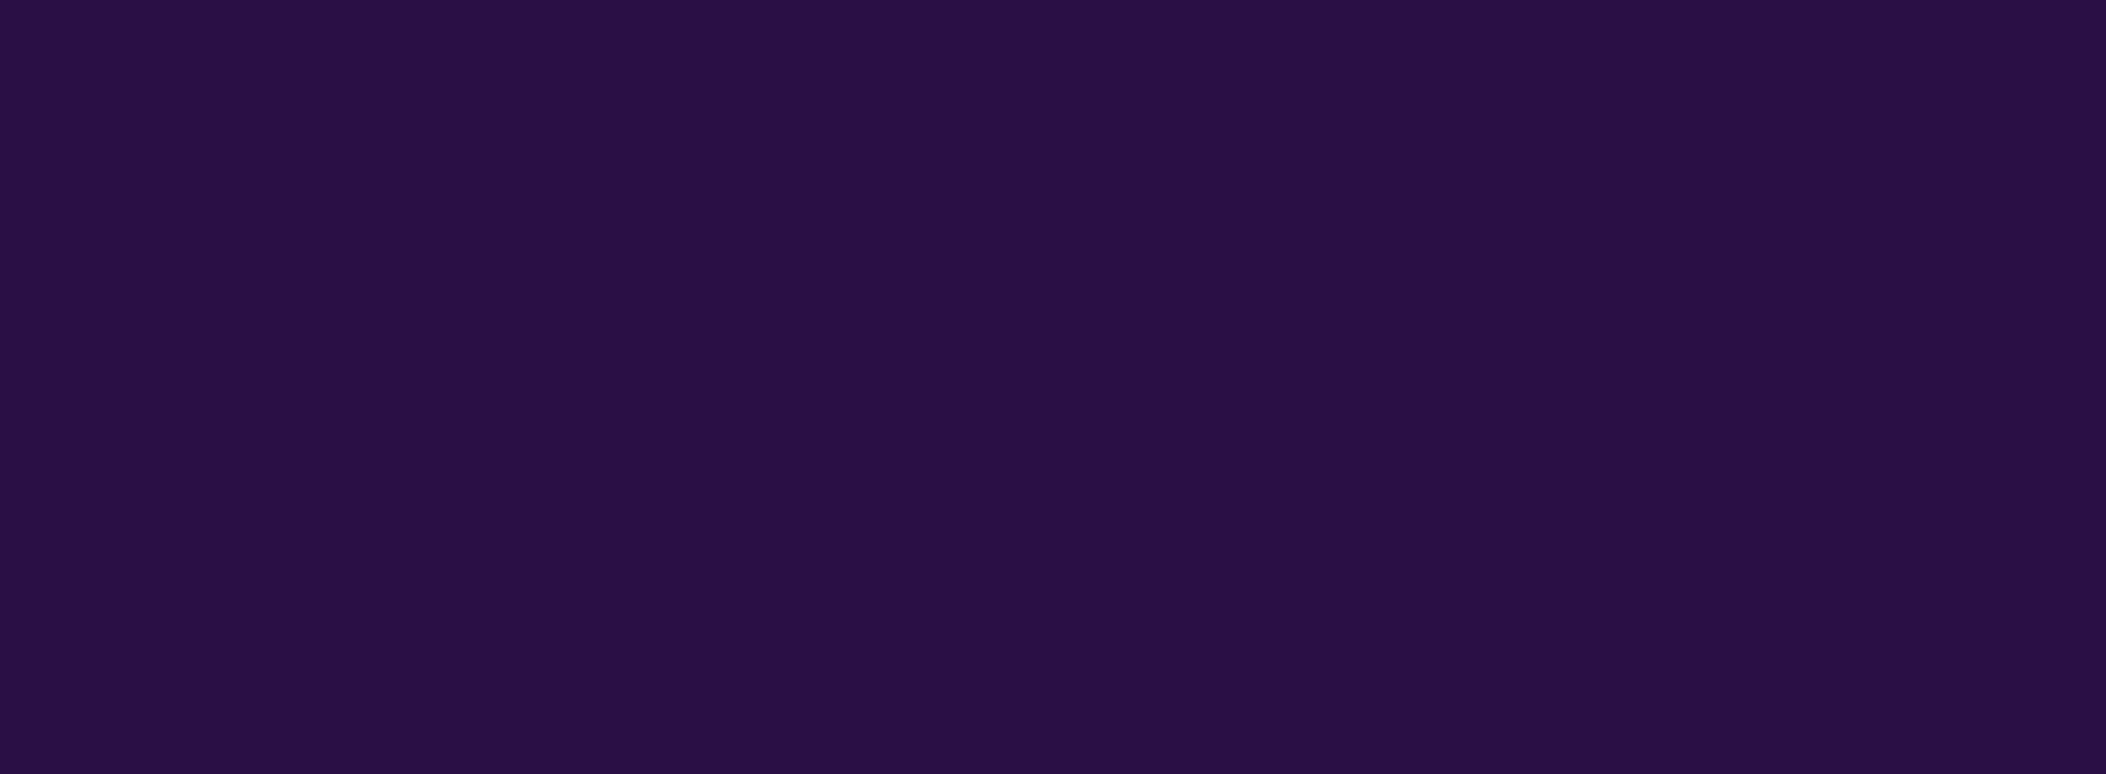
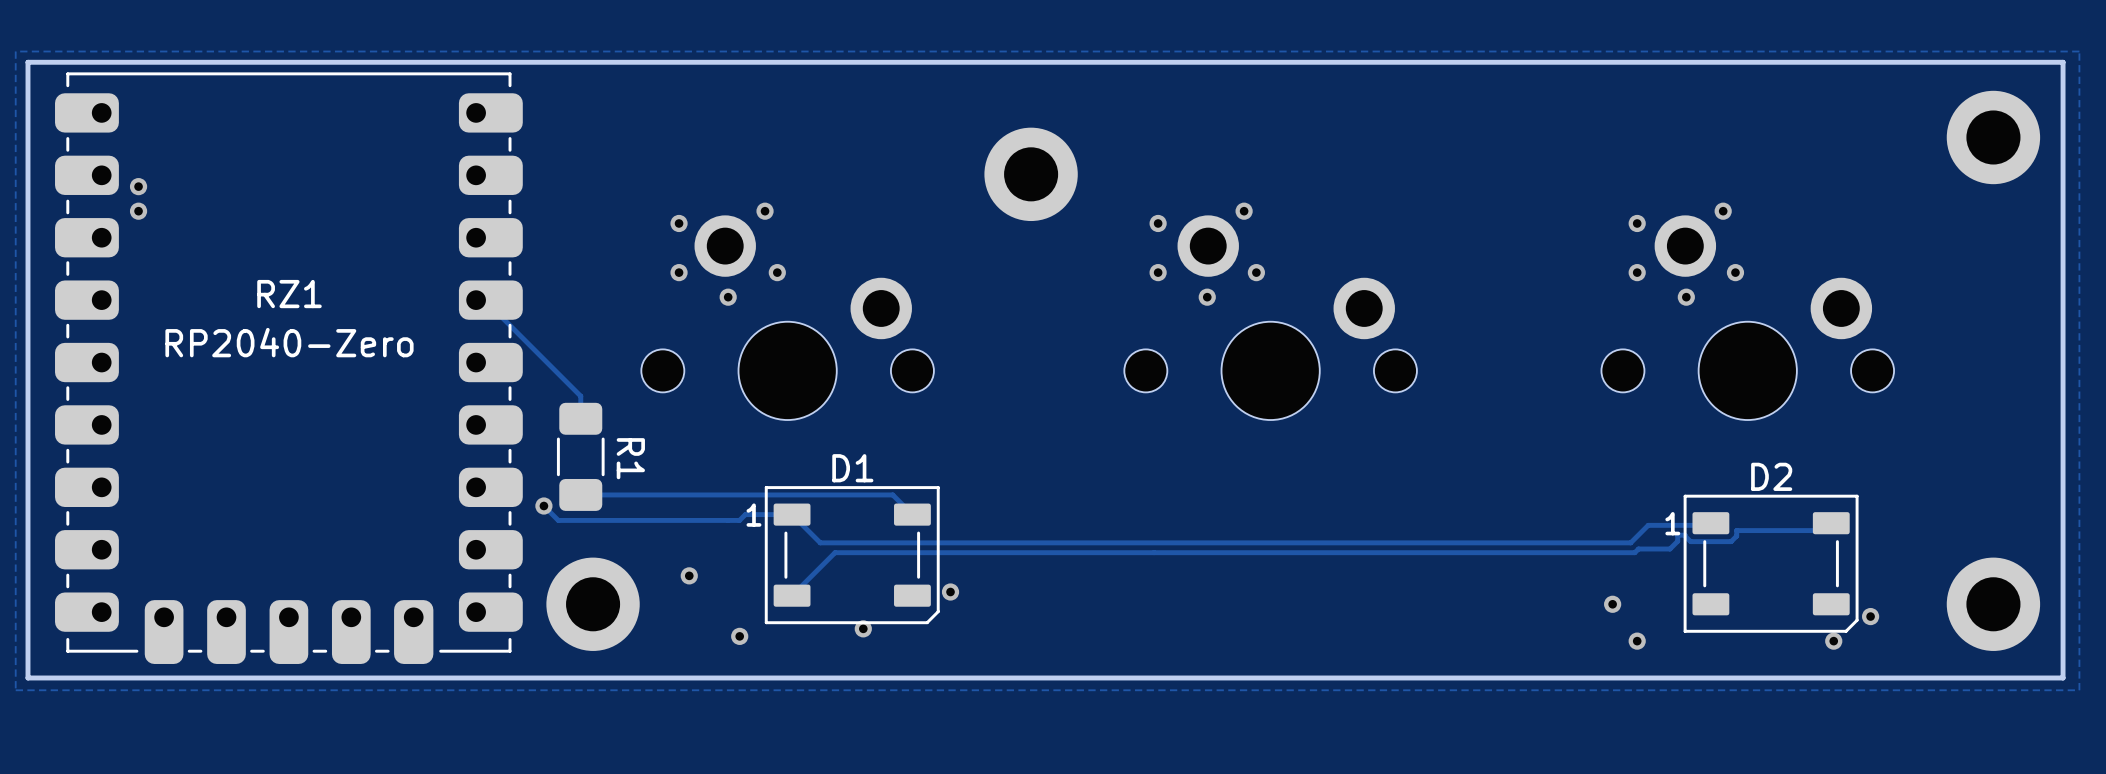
zone outline: none -> (2079, 51) (2079, 690) (15, 690) (15, 51) (2079, 51)
board edge: none -> (2063, 62) (27, 62) (27, 677) (2063, 677) (2063, 62)
part: none -> (1993, 137)
part: none -> (1031, 174)
via: none -> (138, 186)
via: none -> (138, 211)
via: none -> (765, 211)
via: none -> (1244, 211)
via: none -> (1723, 211)
via: none -> (679, 223)
via: none -> (1158, 223)
via: none -> (1637, 223)
via: none -> (679, 272)
via: none -> (777, 272)
via: none -> (1158, 272)
via: none -> (1256, 272)
via: none -> (1637, 272)
via: none -> (1735, 272)
via: none -> (728, 297)
via: none -> (1207, 297)
via: none -> (1686, 297)
track: none -> (476, 300) (484, 300) (580, 396) (580, 418)
part: none -> (787, 317)
part: none -> (1270, 317)
part: none -> (1747, 317)
RZ1: none -> RP2040-Zero (288, 368)
R1: none -> (580, 456)
track: none -> (580, 494) (892, 494) (912, 514)
track: none -> (543, 506) (558, 520) (739, 520) (745, 514) (792, 514) (820, 542) (1630, 542) (1648, 525) (1708, 525) (1710, 523)
via: none -> (543, 506)
track: none -> (1831, 523) (1823, 530) (1736, 530) (1736, 536) (1731, 541) (1690, 541) (1685, 535) (1677, 535) (1677, 541) (1669, 549) (1638, 549) (1634, 552) (835, 552) (792, 595)
D1: none -> (852, 555)
D2: none -> (1771, 563)
via: none -> (689, 575)
via: none -> (950, 591)
part: none -> (593, 604)
via: none -> (1612, 604)
part: none -> (1993, 604)
via: none -> (1870, 616)
via: none -> (863, 628)
via: none -> (739, 636)
via: none -> (1637, 641)
via: none -> (1833, 641)

